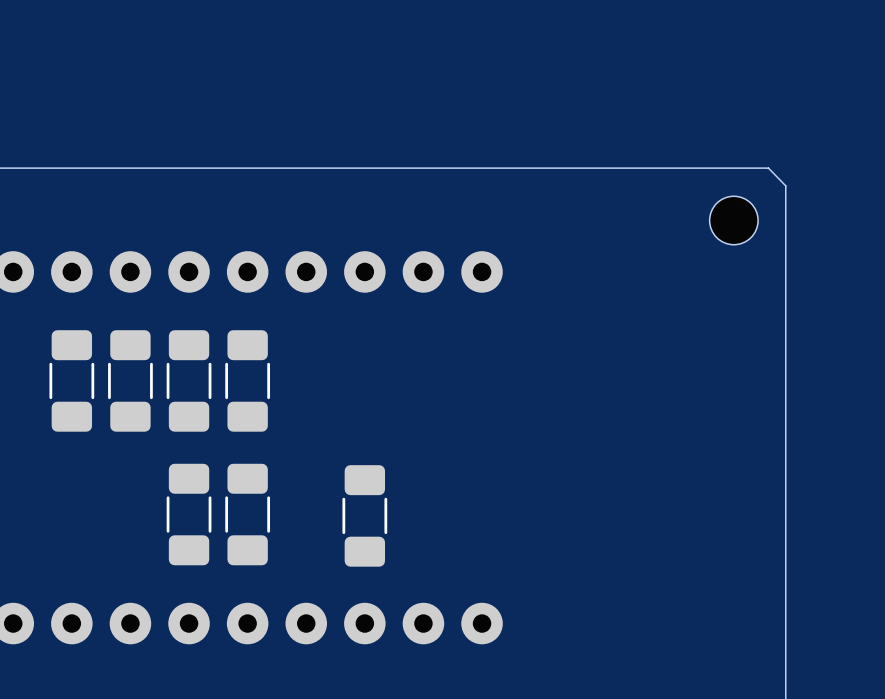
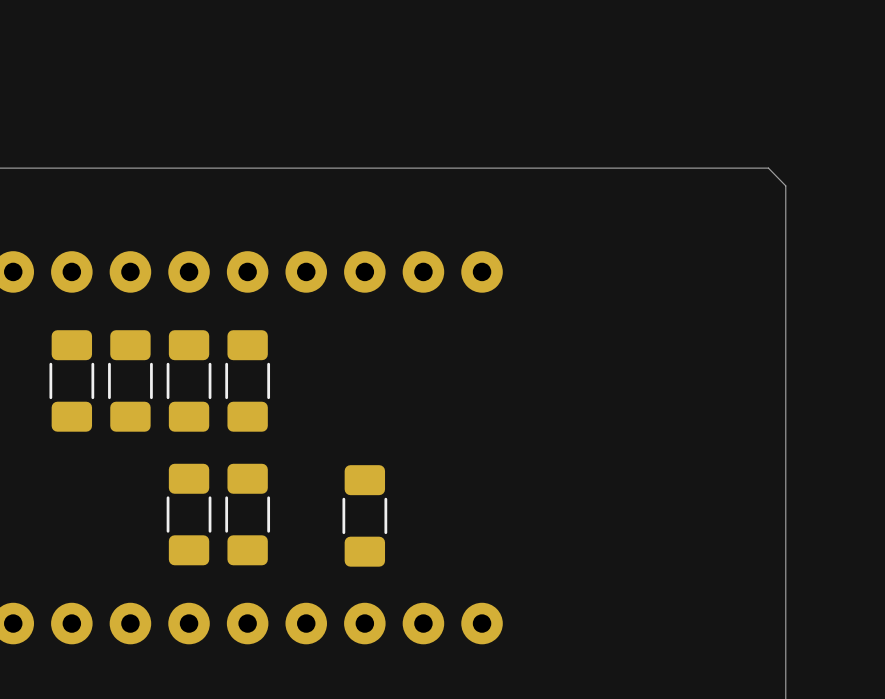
part: (733, 220) -> none

